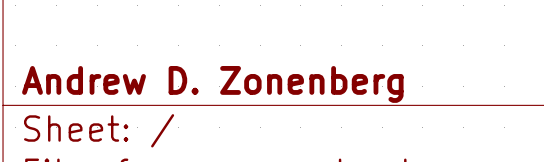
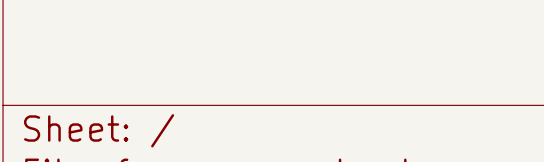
title block: Andrew D. Zonenberg (212, 84) -> none

